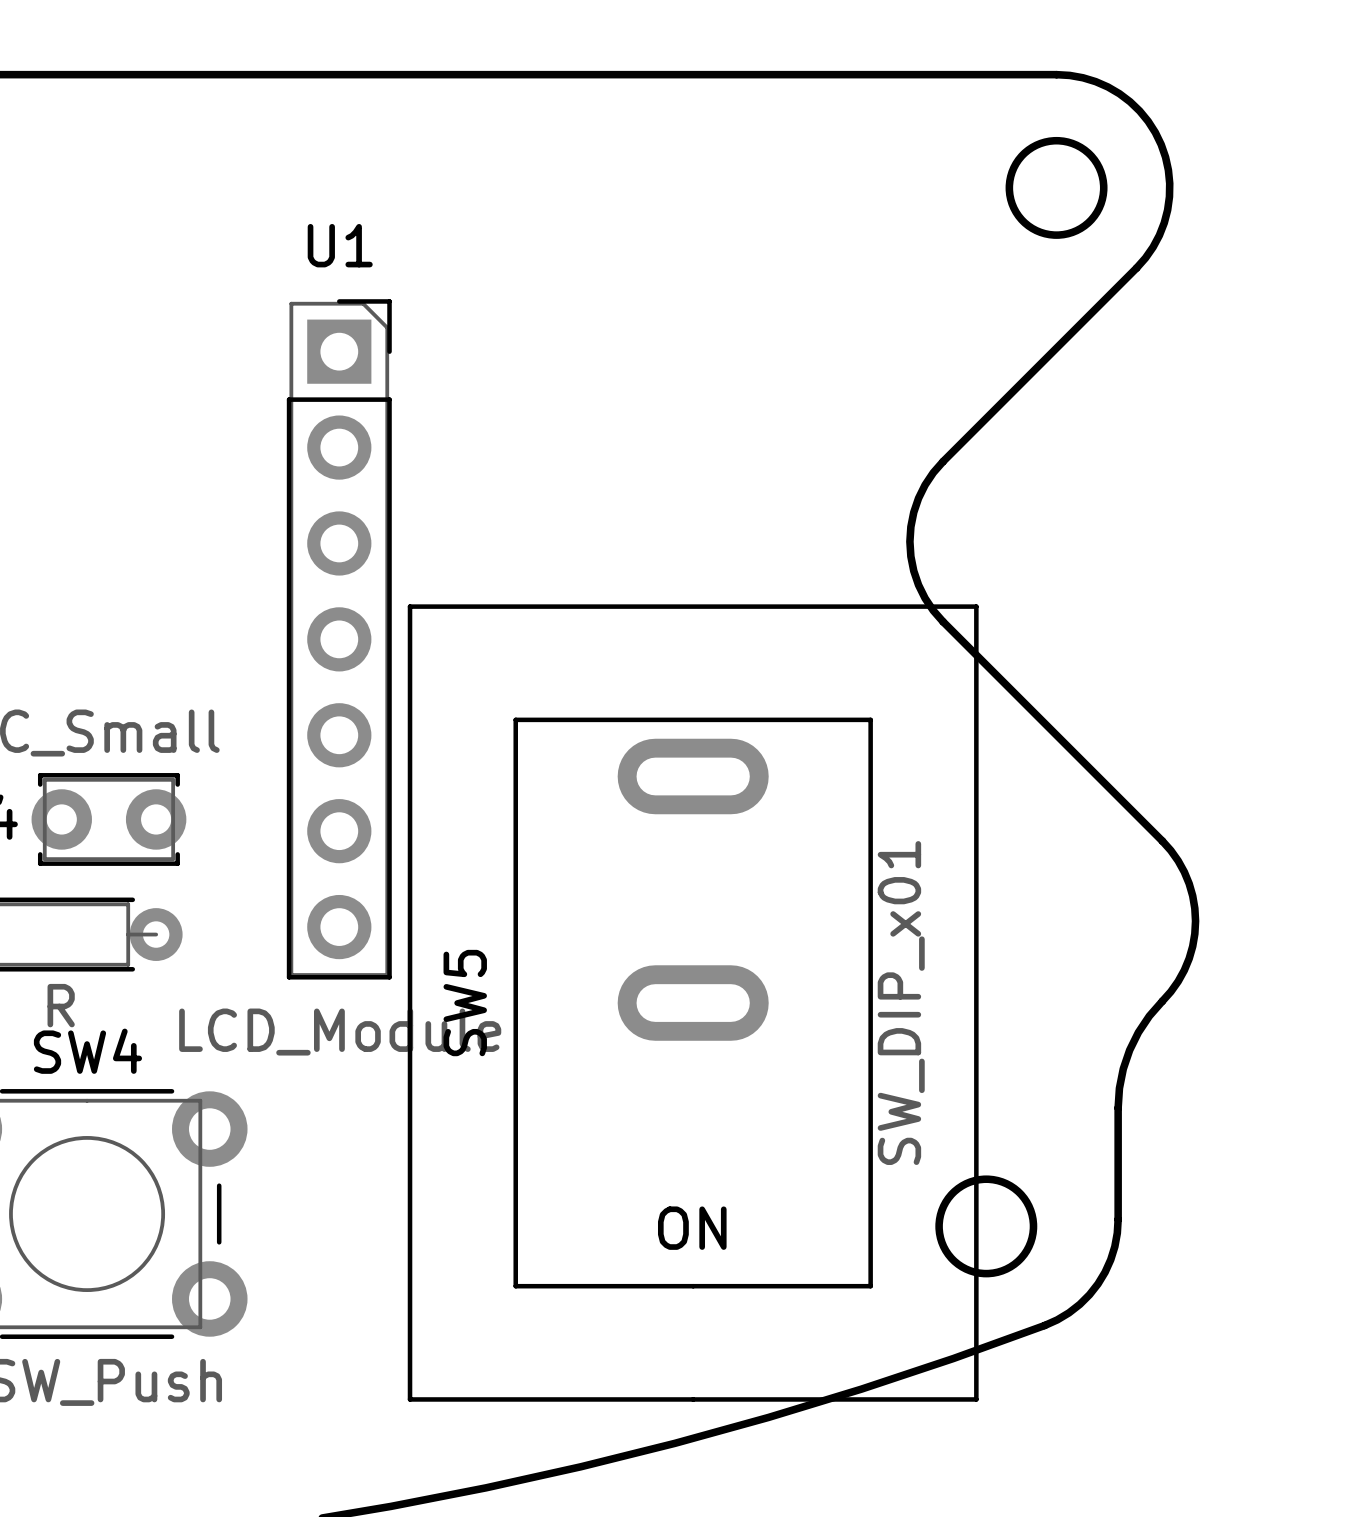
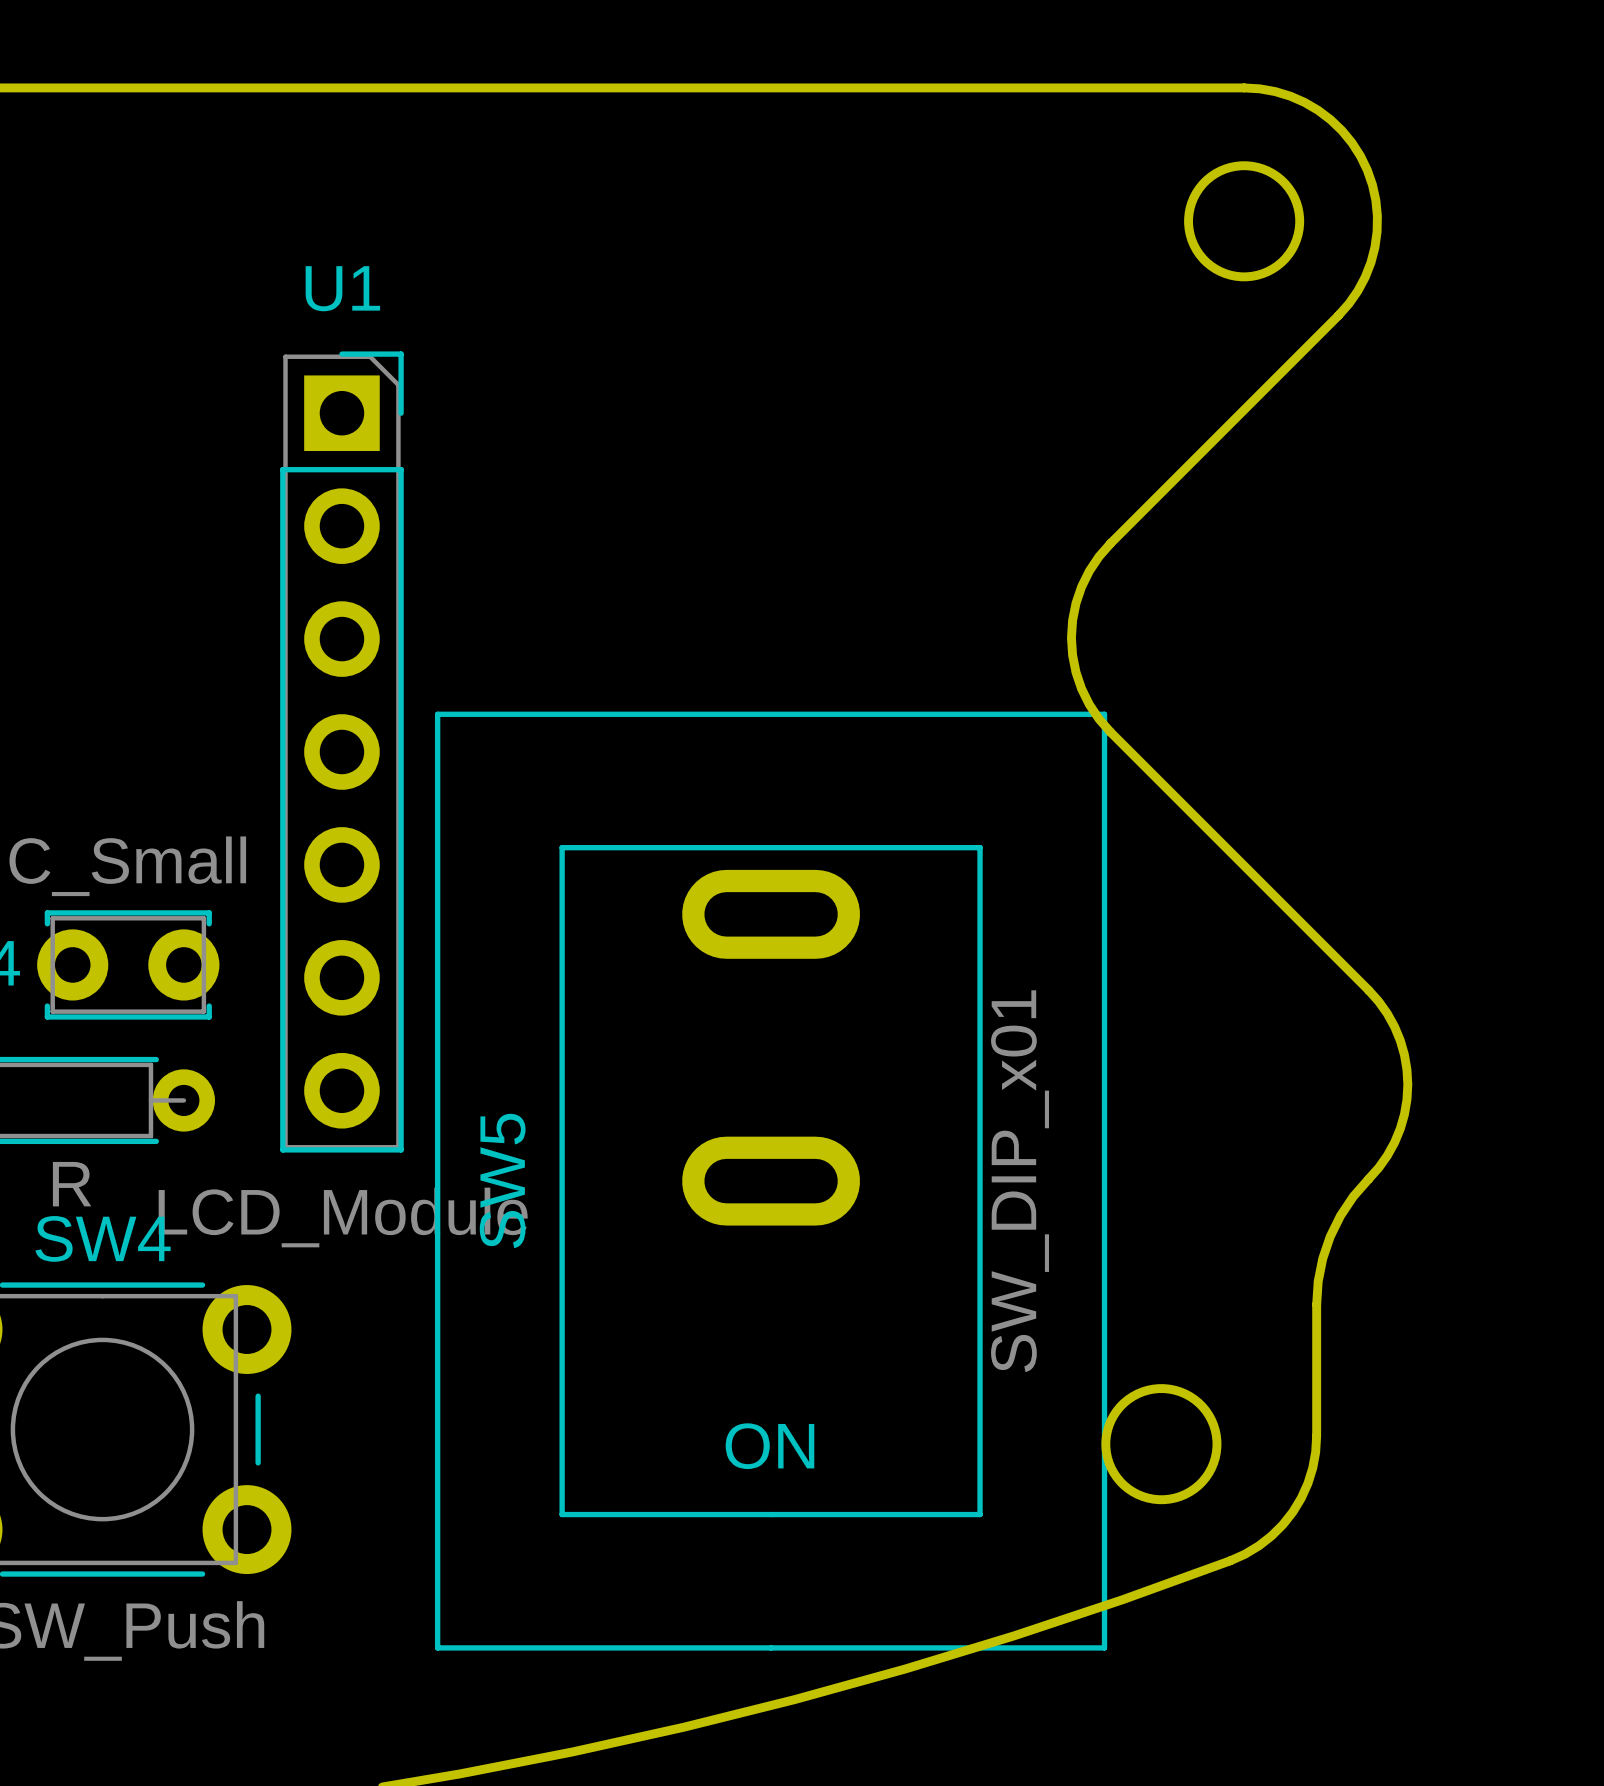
U1 position: (339, 639) -> (341, 751)
SW5 position: (693, 1003) -> (771, 1181)

